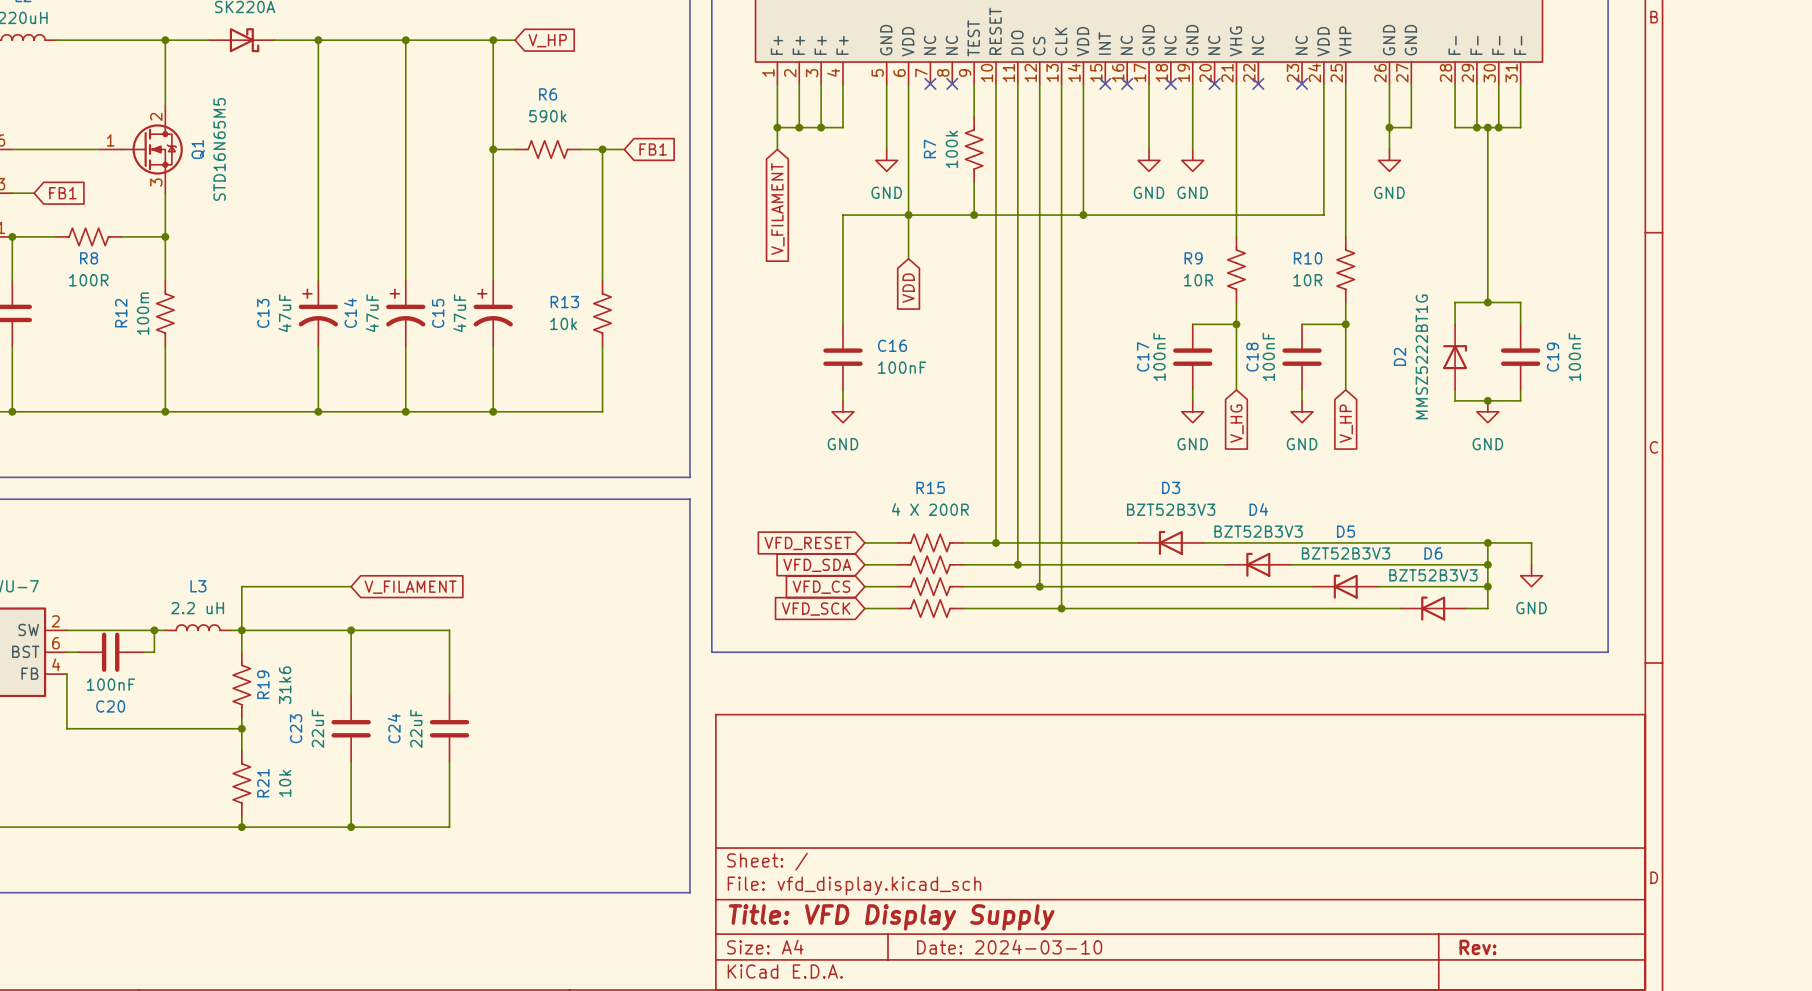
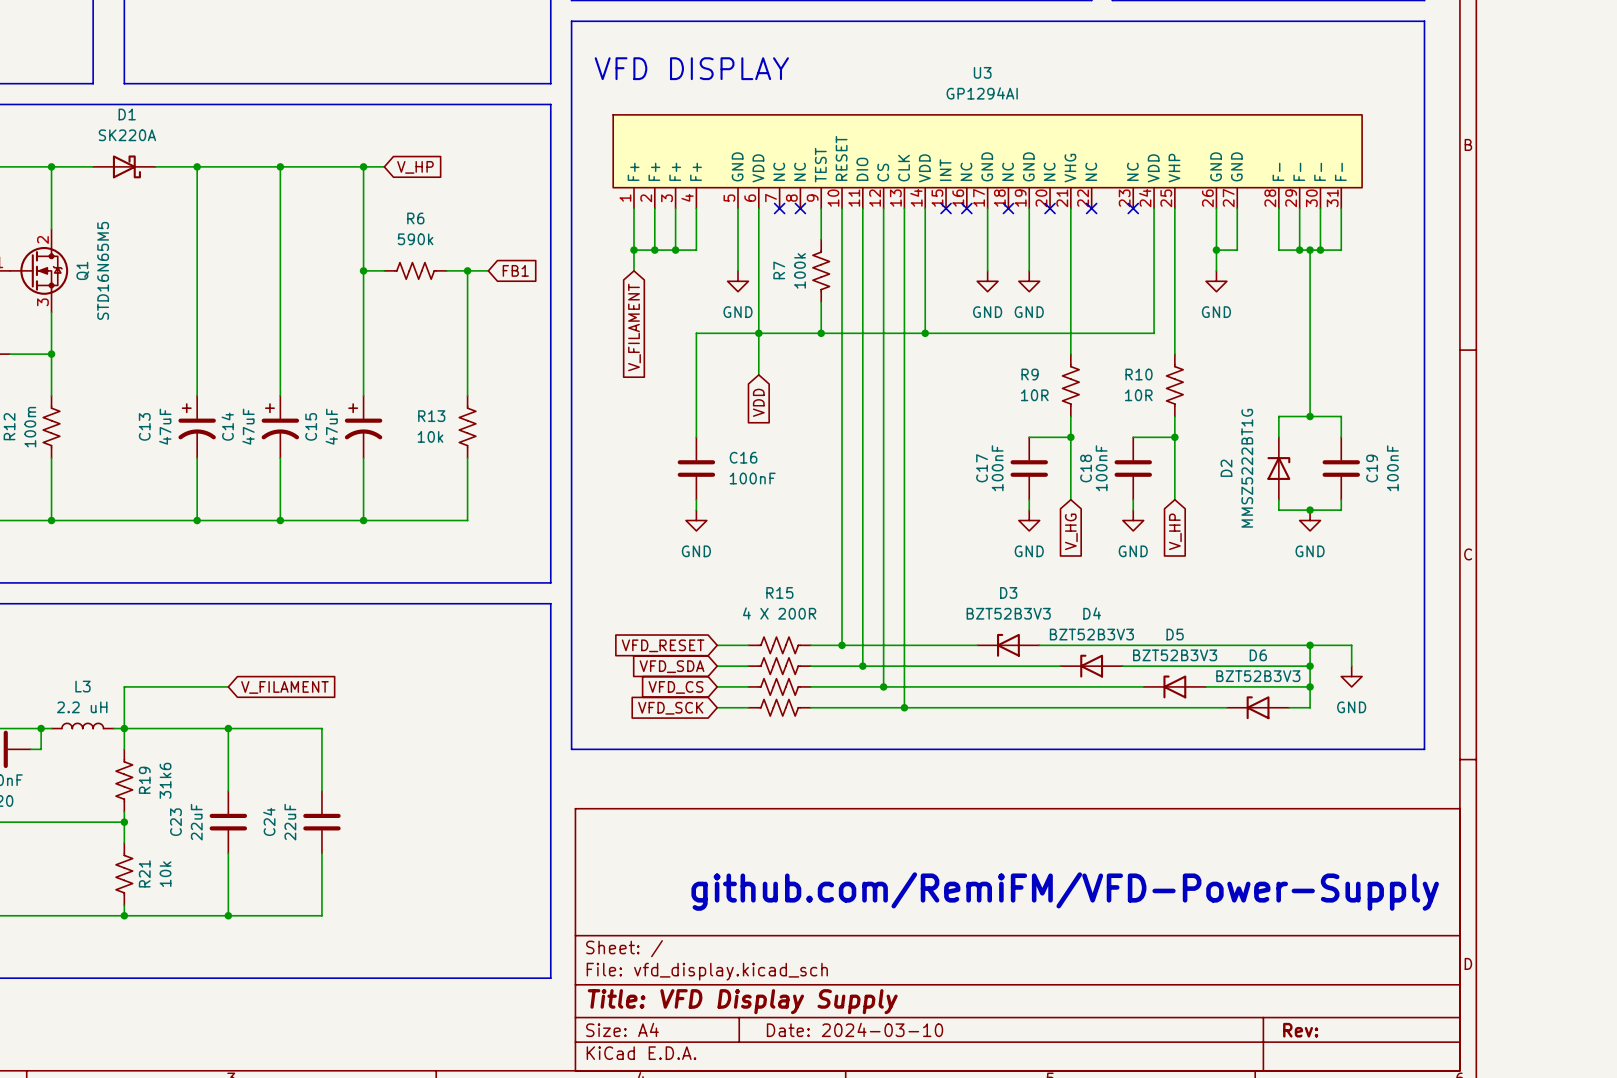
text: none -> github.com/RemiFM/VFD-Power-Supply (1065, 891)

